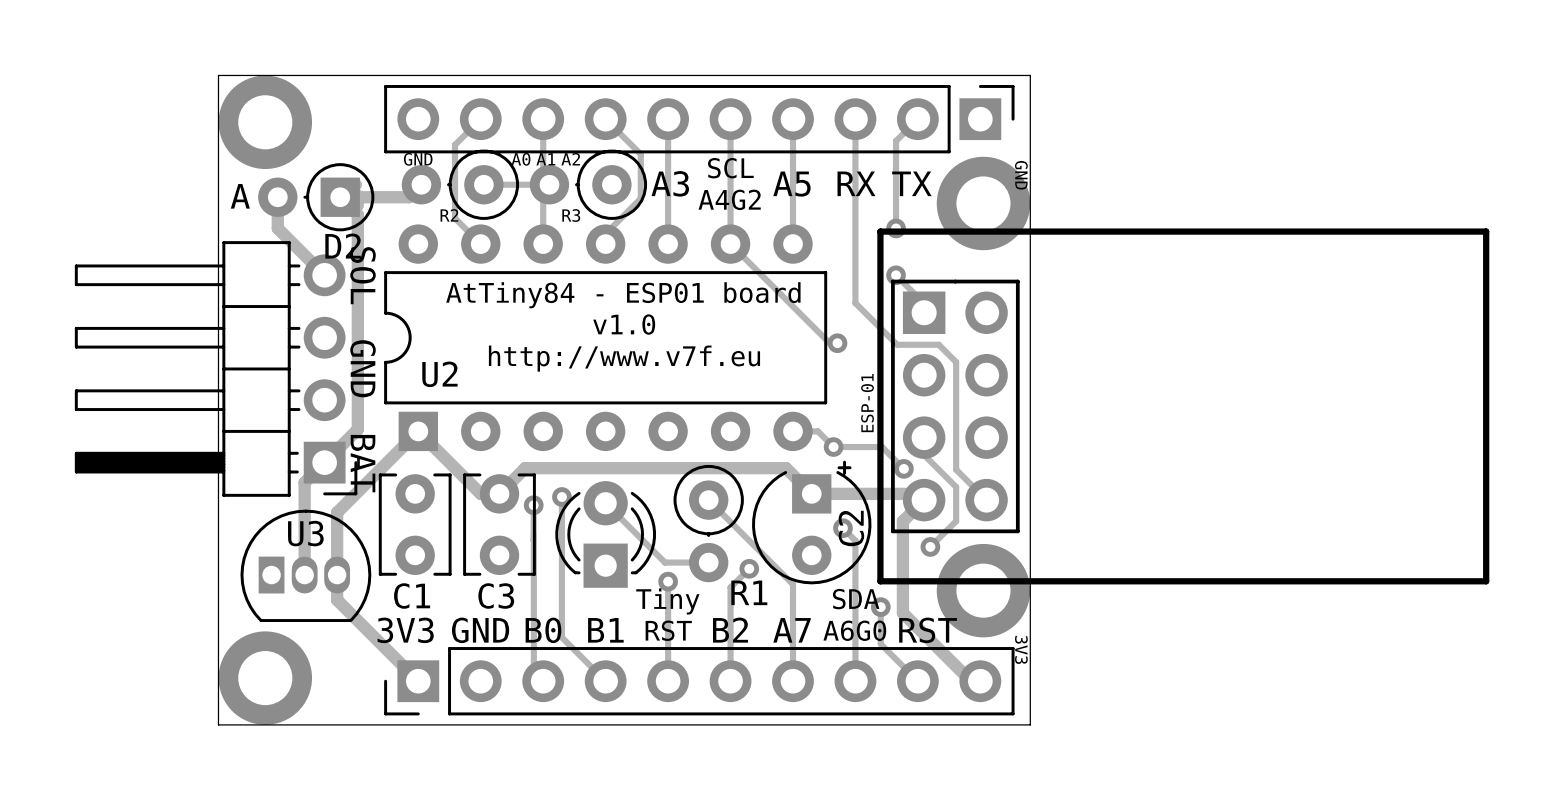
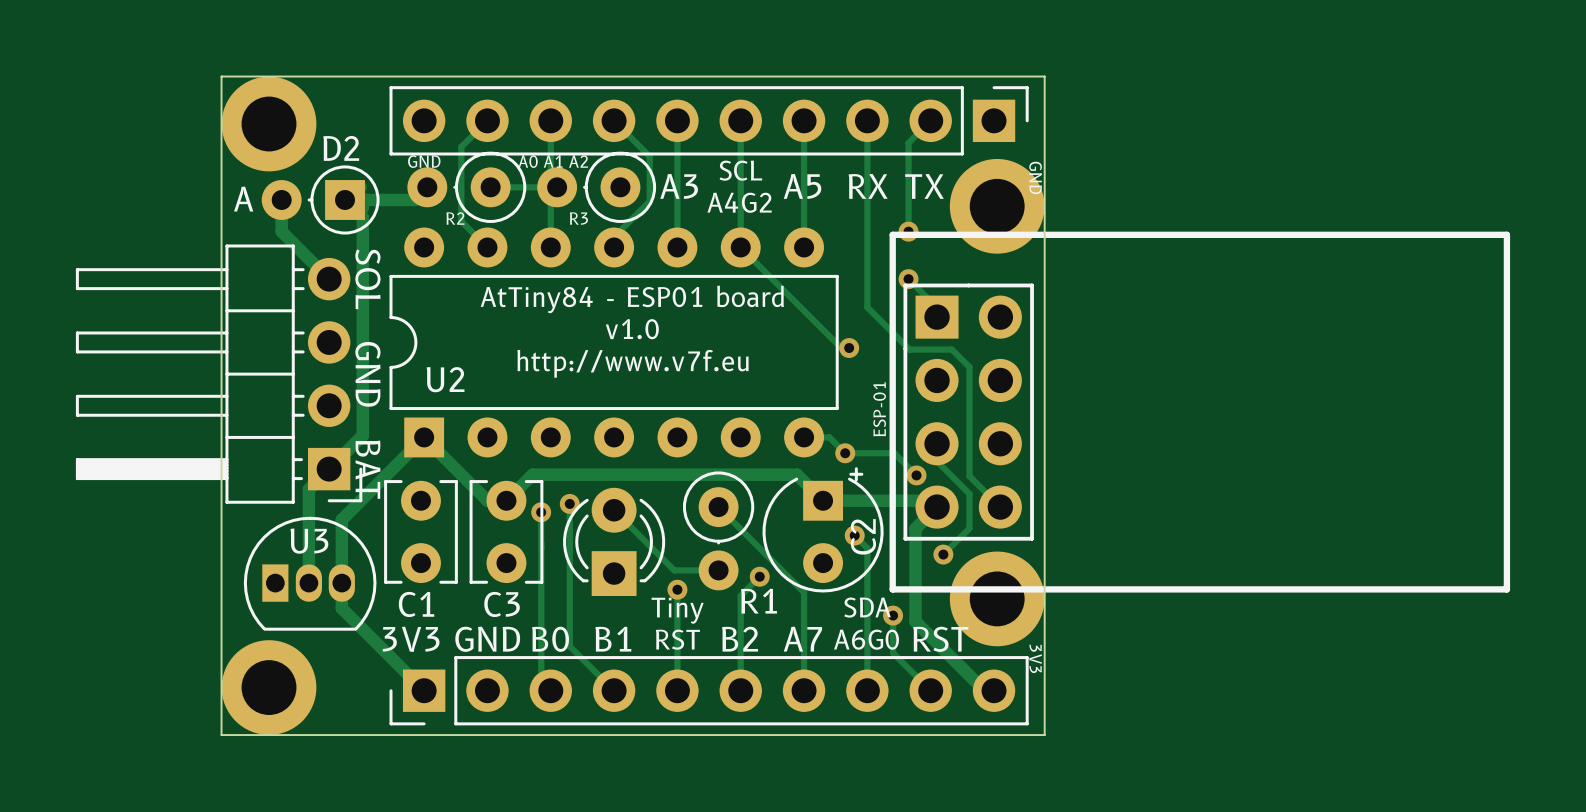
D2 name position: D2 (343, 246) -> D2 (341, 148)

